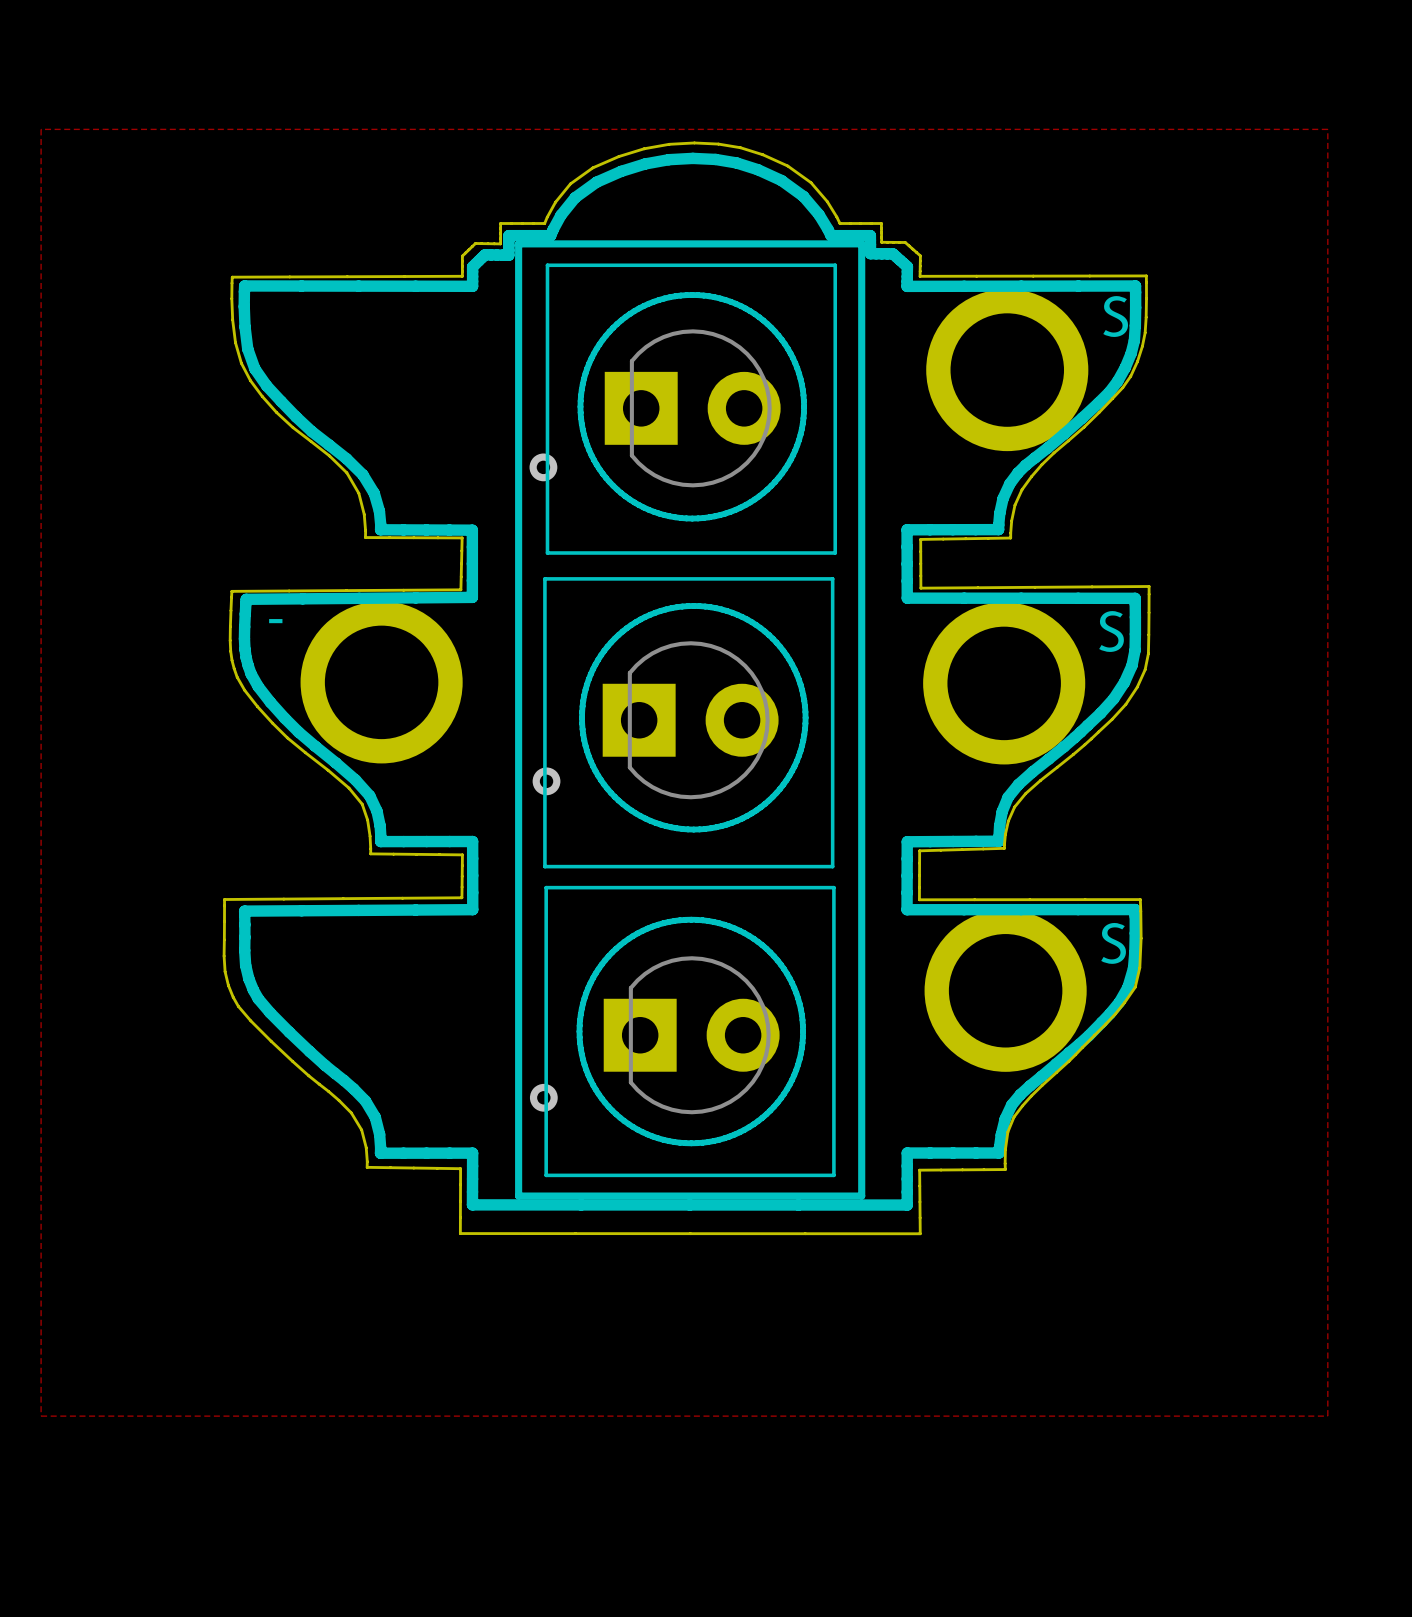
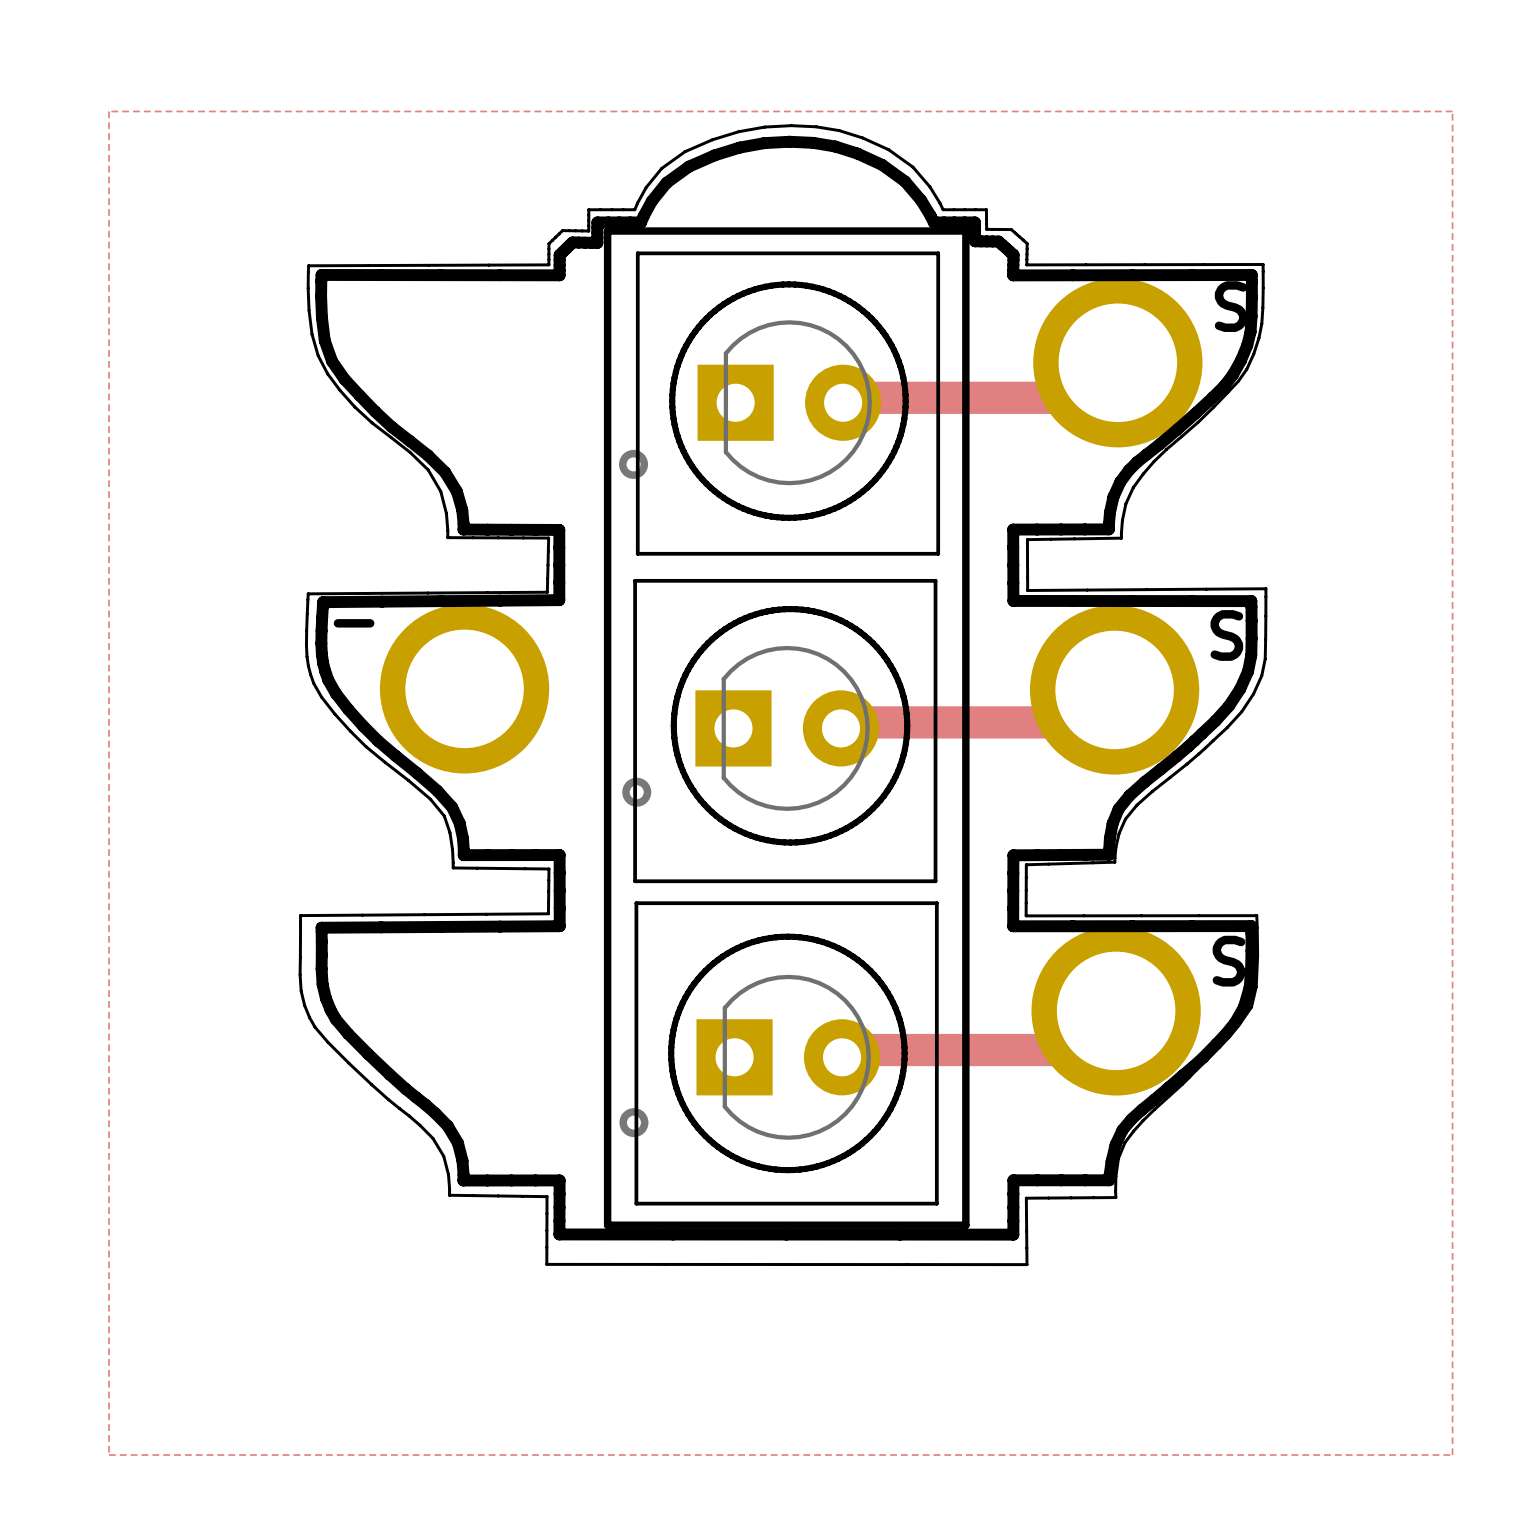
track: none -> (845, 397) (1082, 397)
track: none -> (847, 722) (1082, 722)
track: none -> (845, 1050) (1077, 1050)

